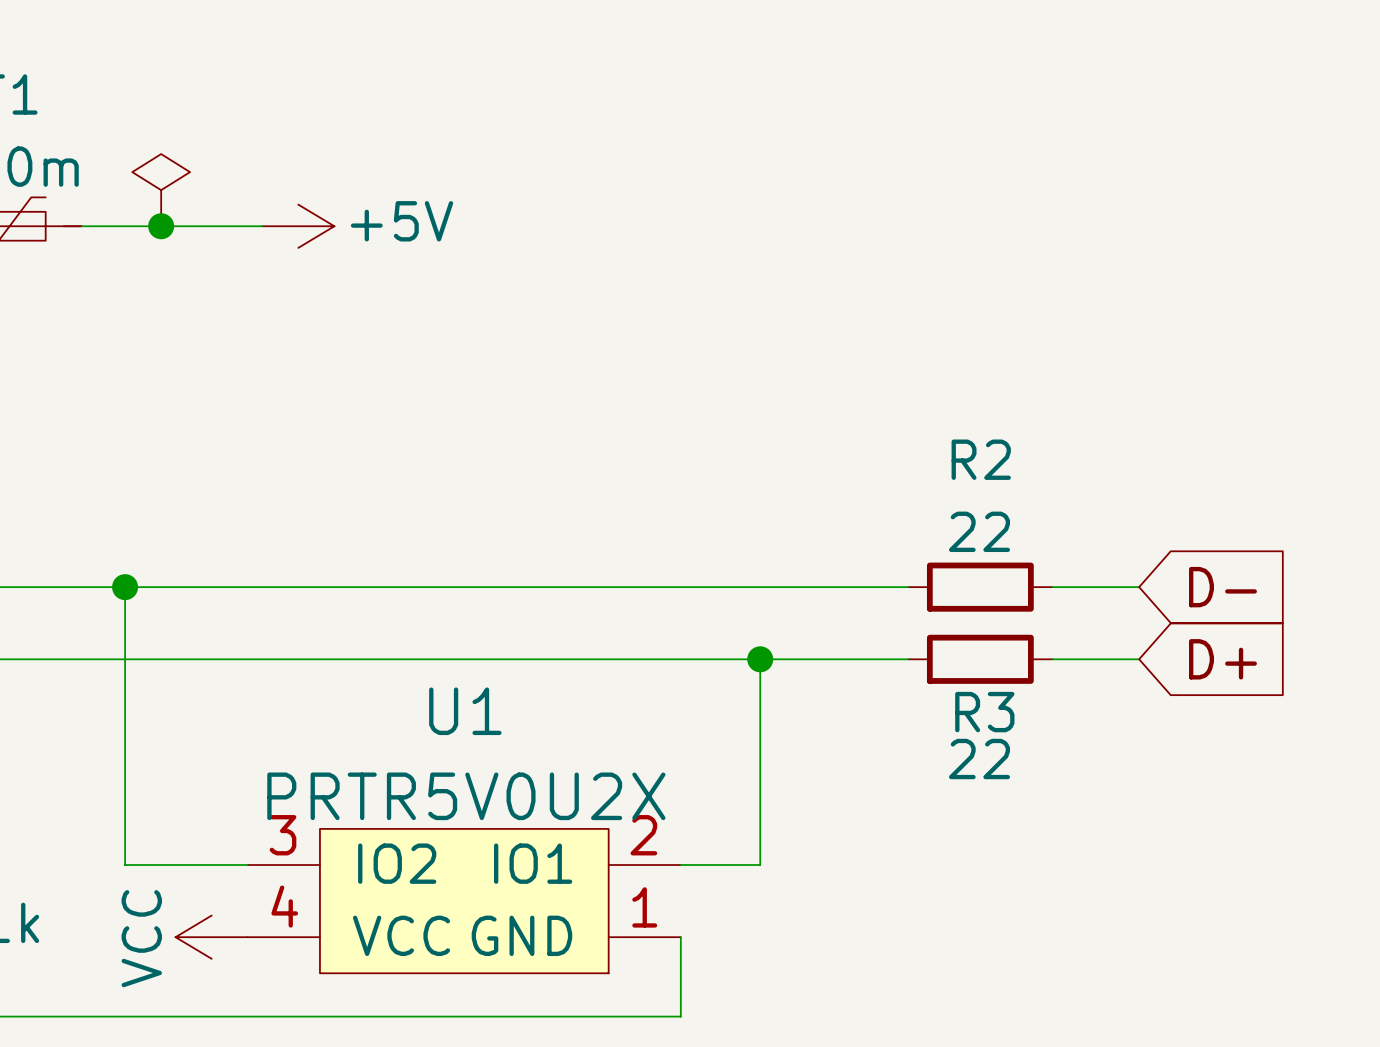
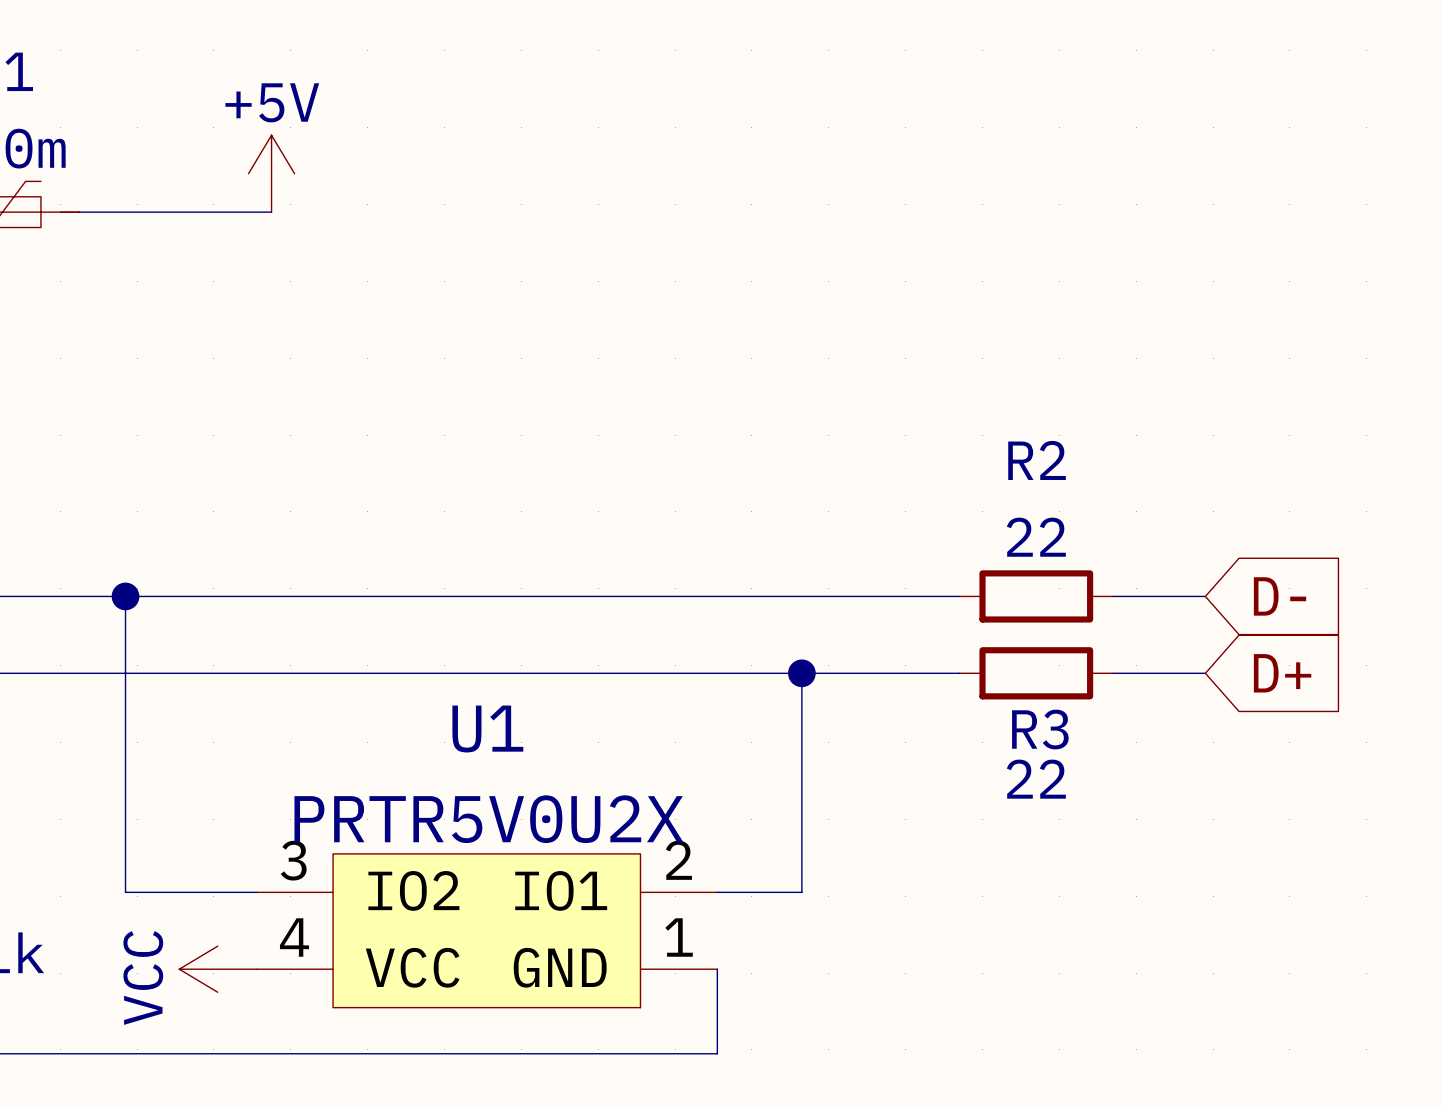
power symbol: (161, 190) -> none
junction: (161, 226) -> none
power symbol rotation: 0° (298, 226) -> 90° counterclockwise (271, 173)
power symbol position: +5V (298, 226) -> +5V (271, 173)

